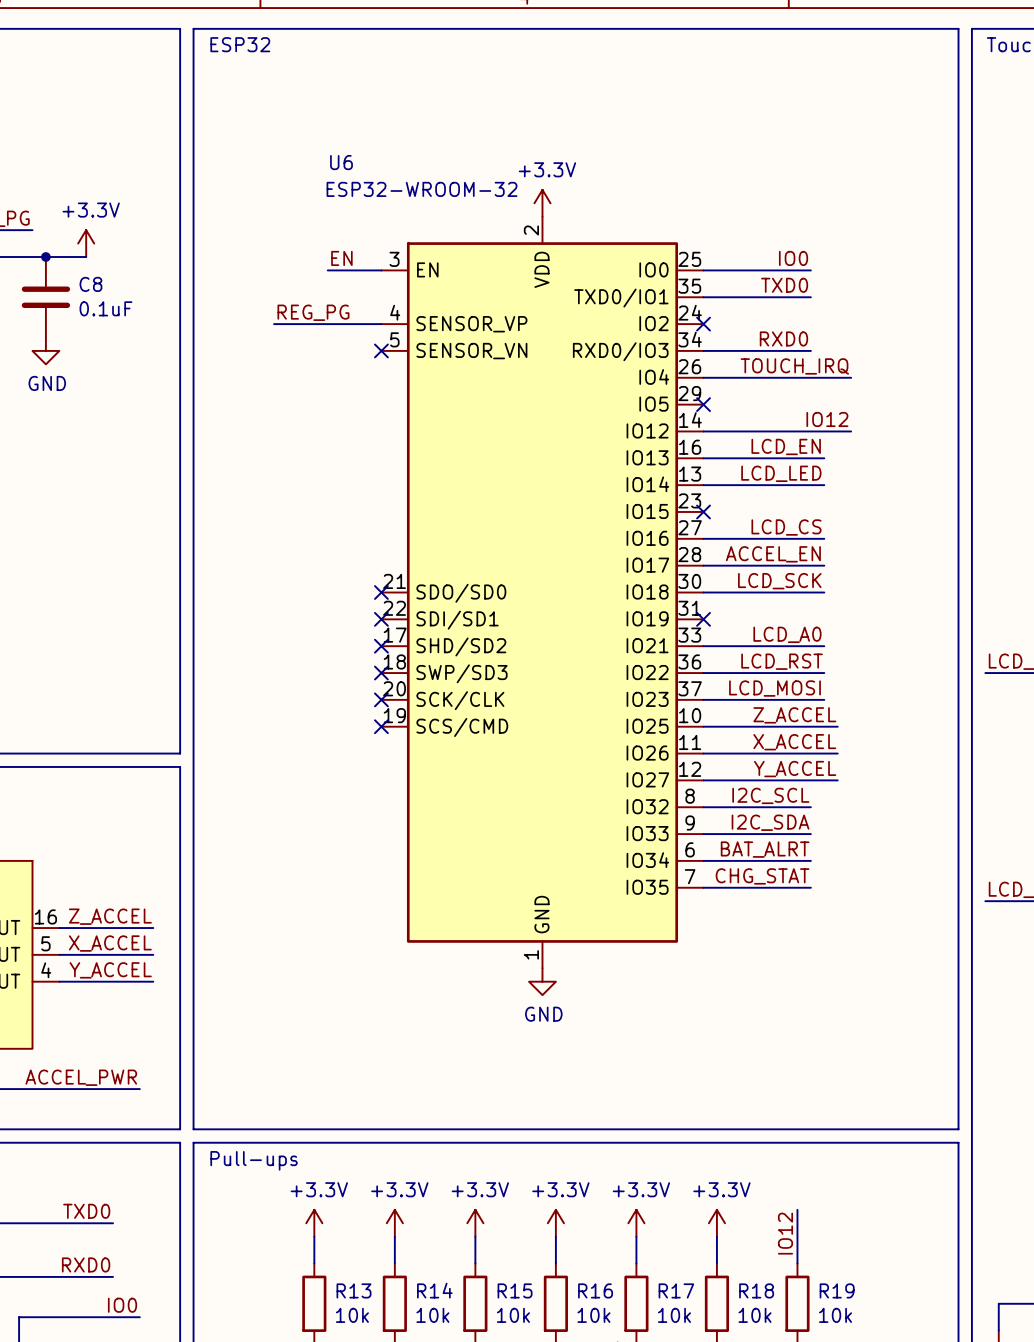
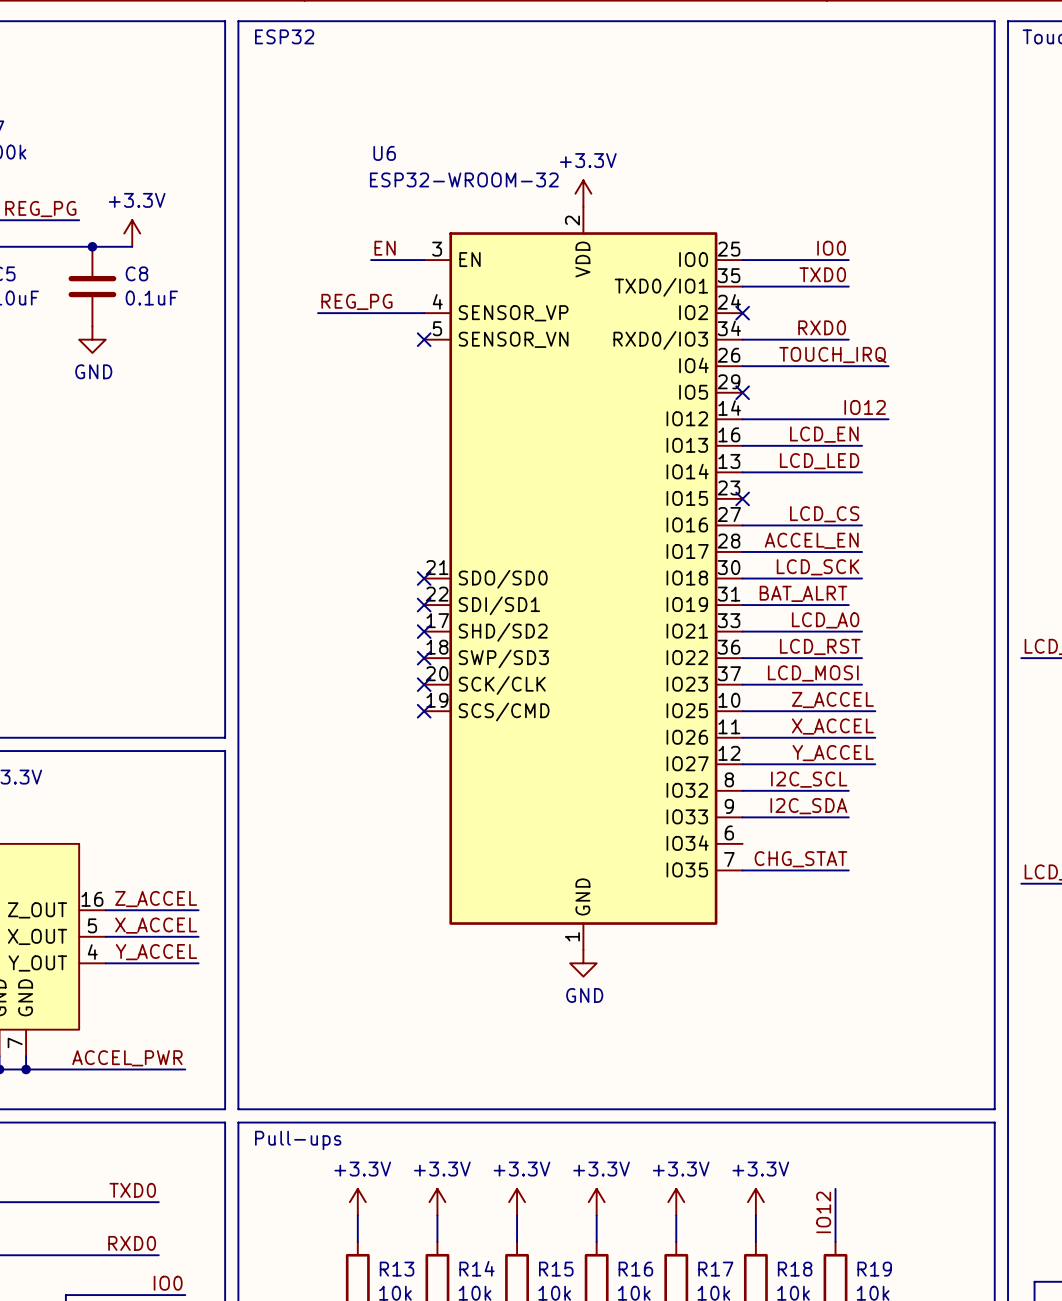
no-connect mark: (703, 619) -> none
label position: BAT_ALRT (765, 849) -> BAT_ALRT (803, 593)
wire: (703, 860) (810, 860) -> (742, 605) (848, 605)

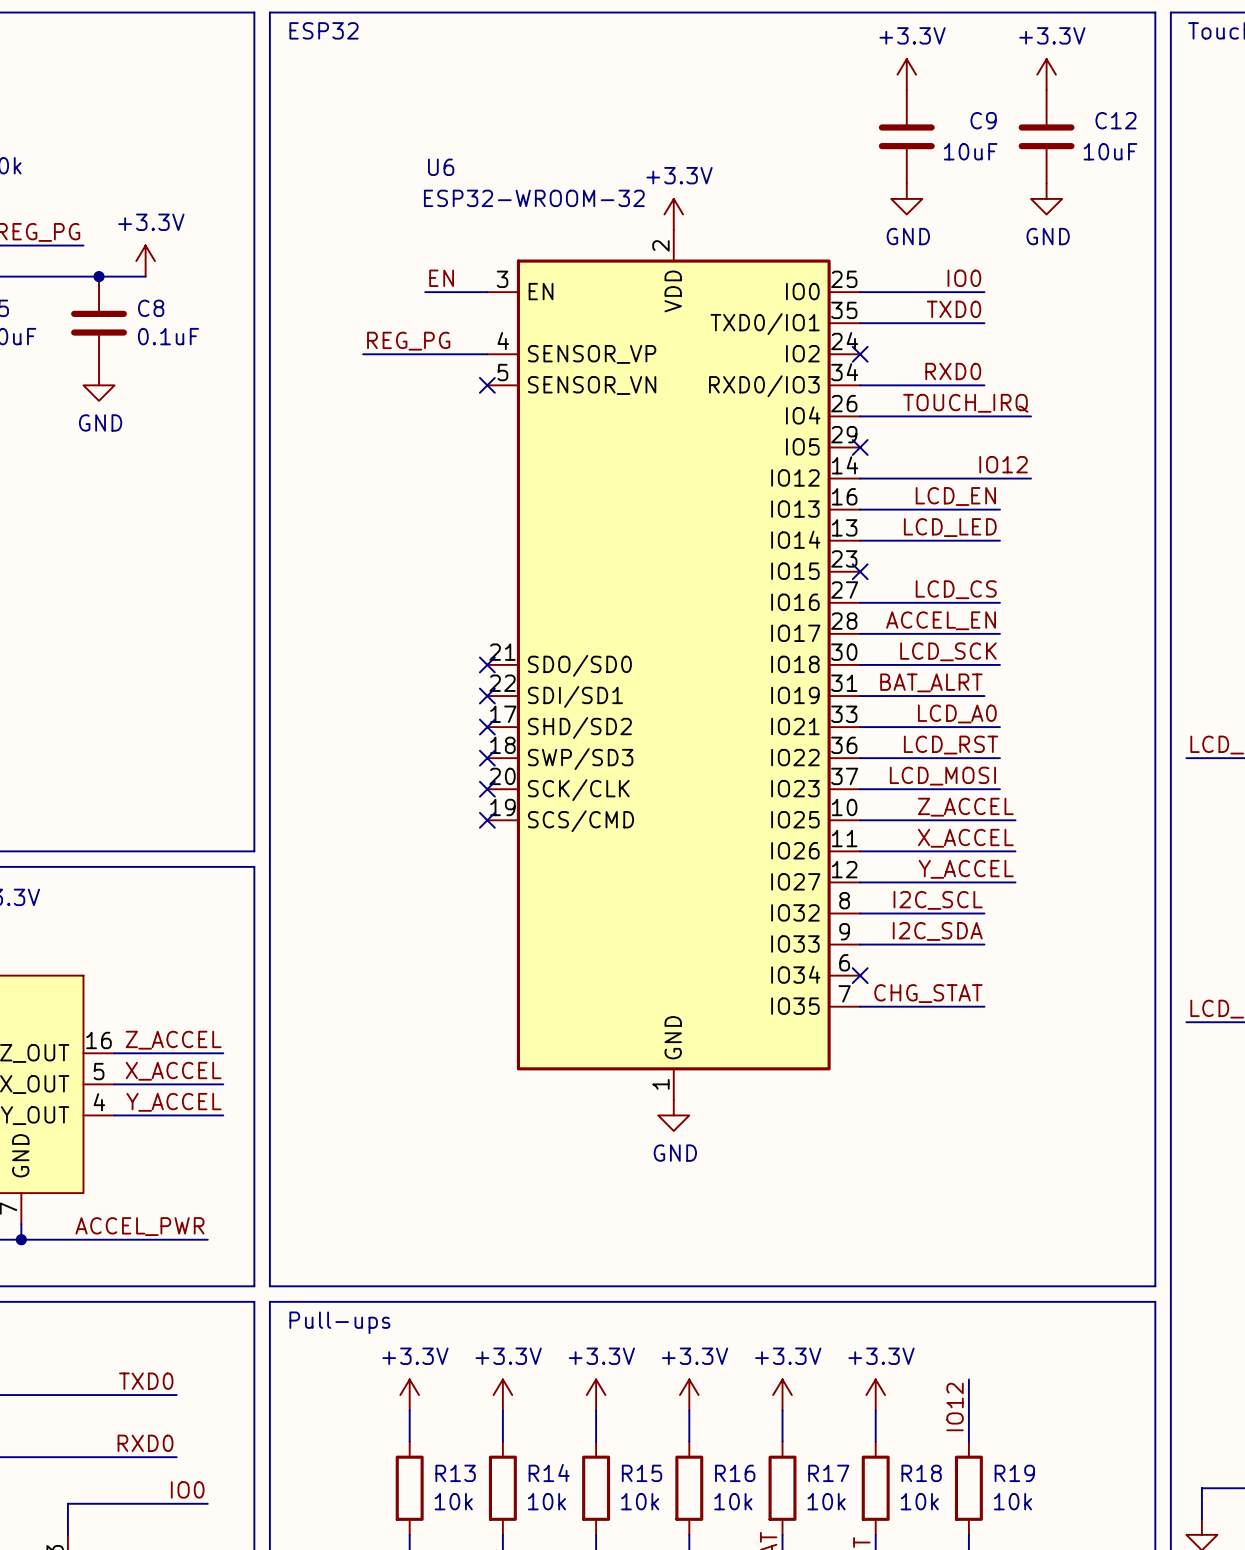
power symbol: none -> +3.3V (906, 74)
power symbol: none -> +3.3V (1046, 74)
C9: none -> 10uF (906, 136)
C12: none -> 10uF (1046, 136)
power symbol: none -> GND (906, 198)
power symbol: none -> GND (1046, 198)
no-connect mark: none -> (860, 975)

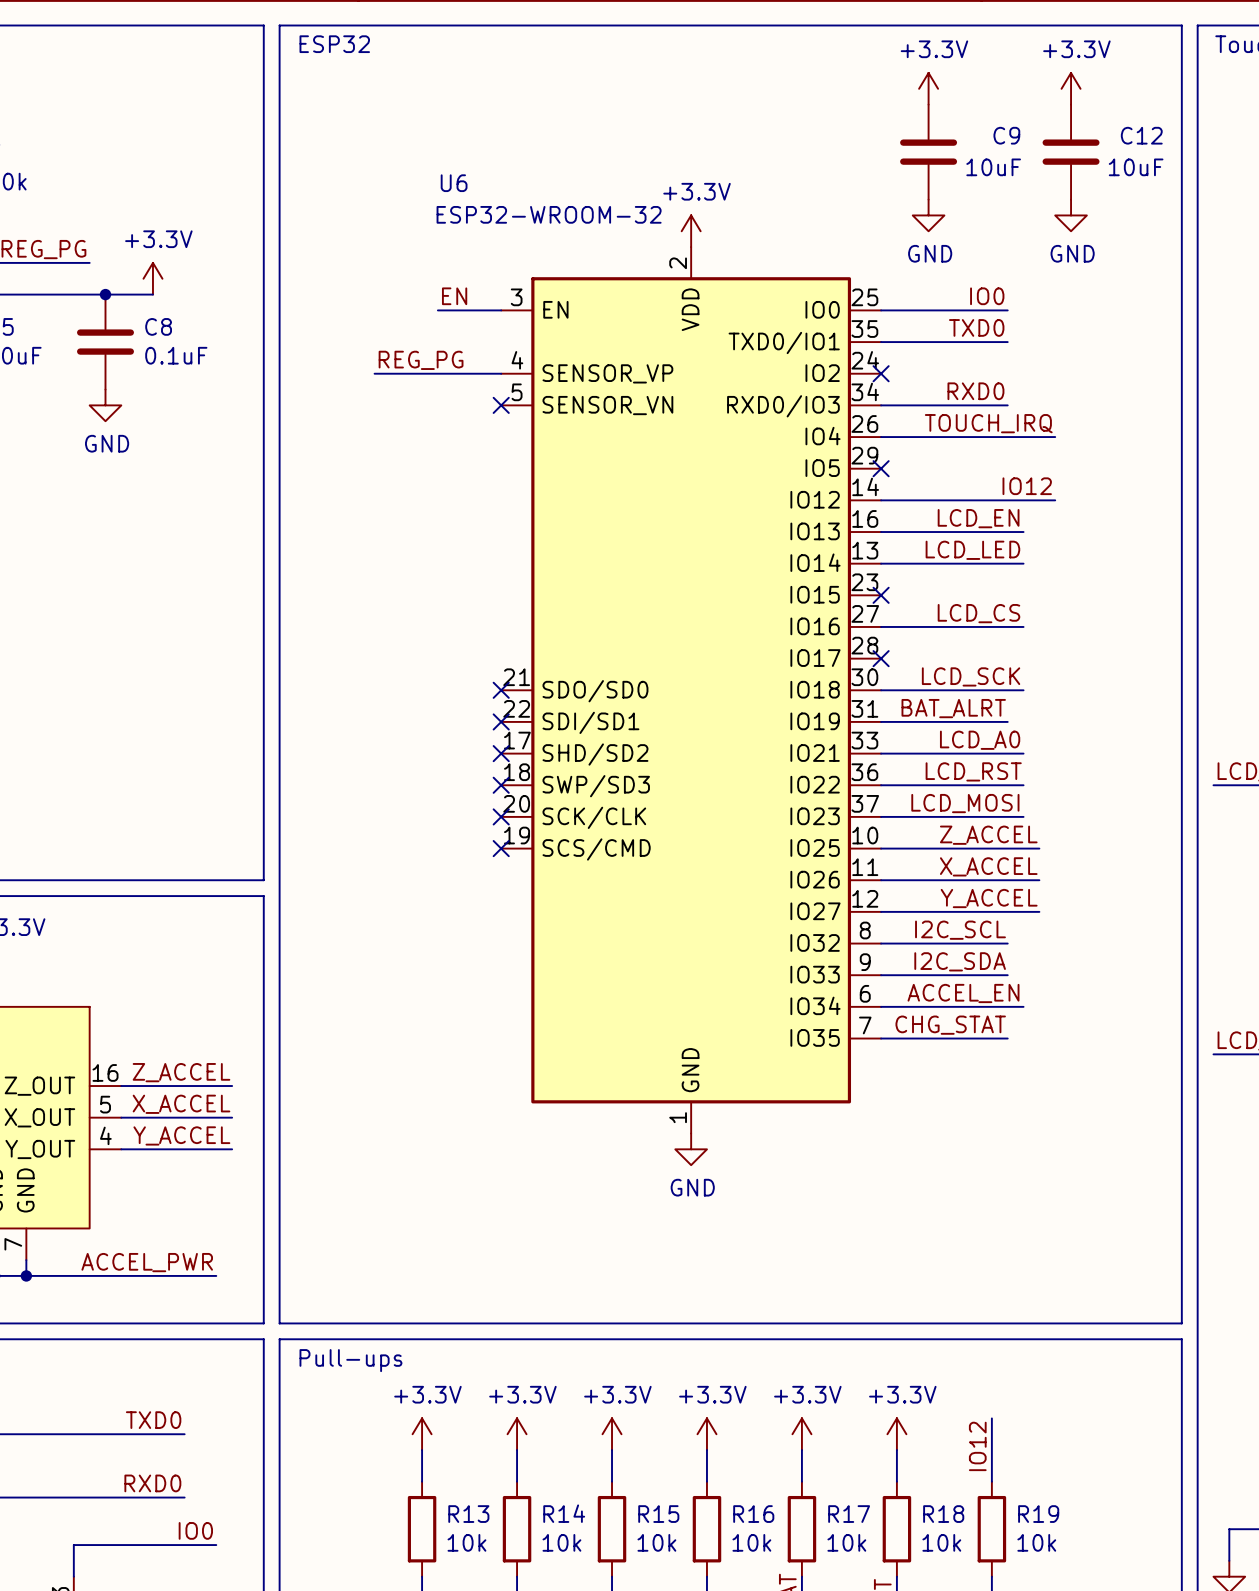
label: ACCEL_EN (941, 620) -> none
wire: (860, 633) (999, 633) -> none
no-connect mark: none -> (881, 658)
label: none -> ACCEL_EN (963, 993)
wire: none -> (881, 1006) (1023, 1006)
no-connect mark: (860, 975) -> none

